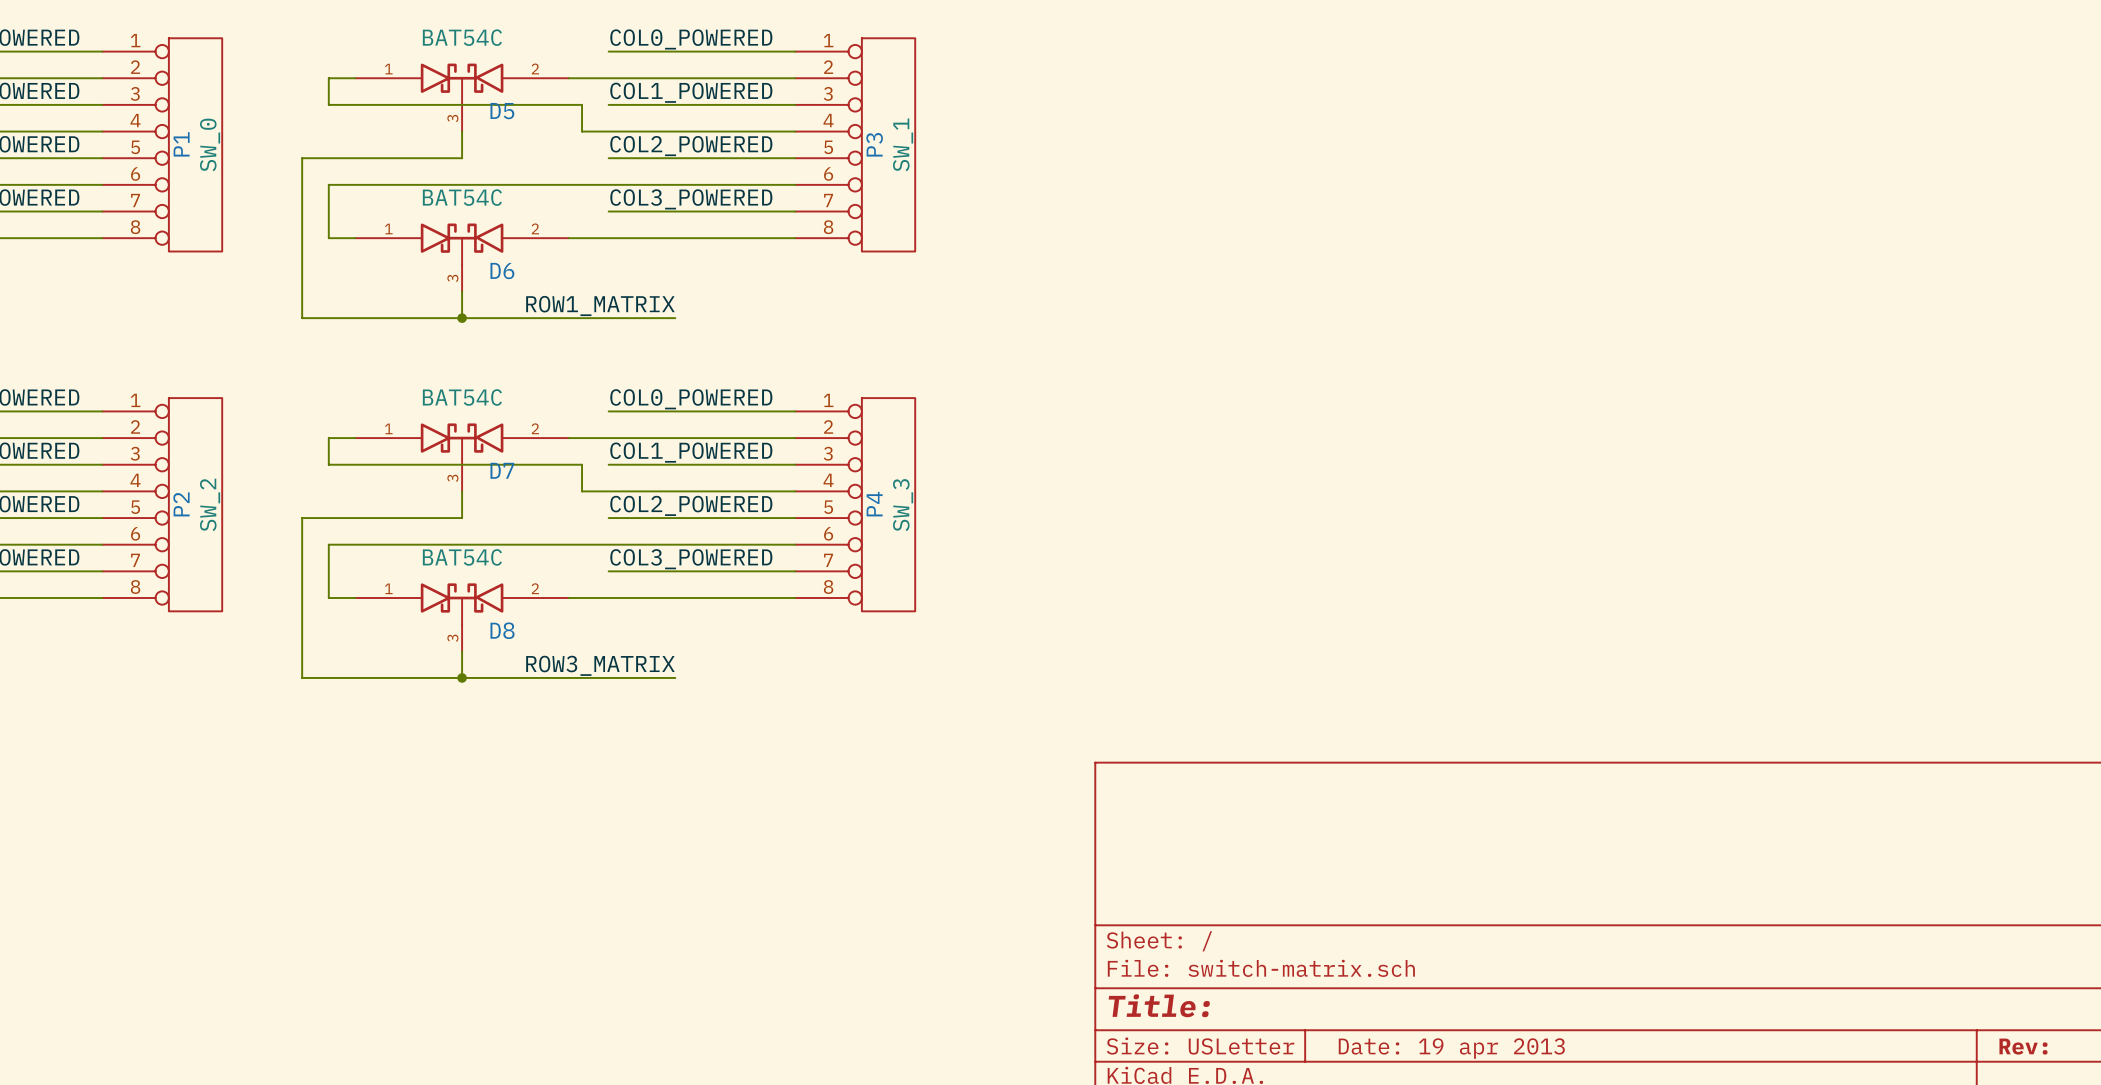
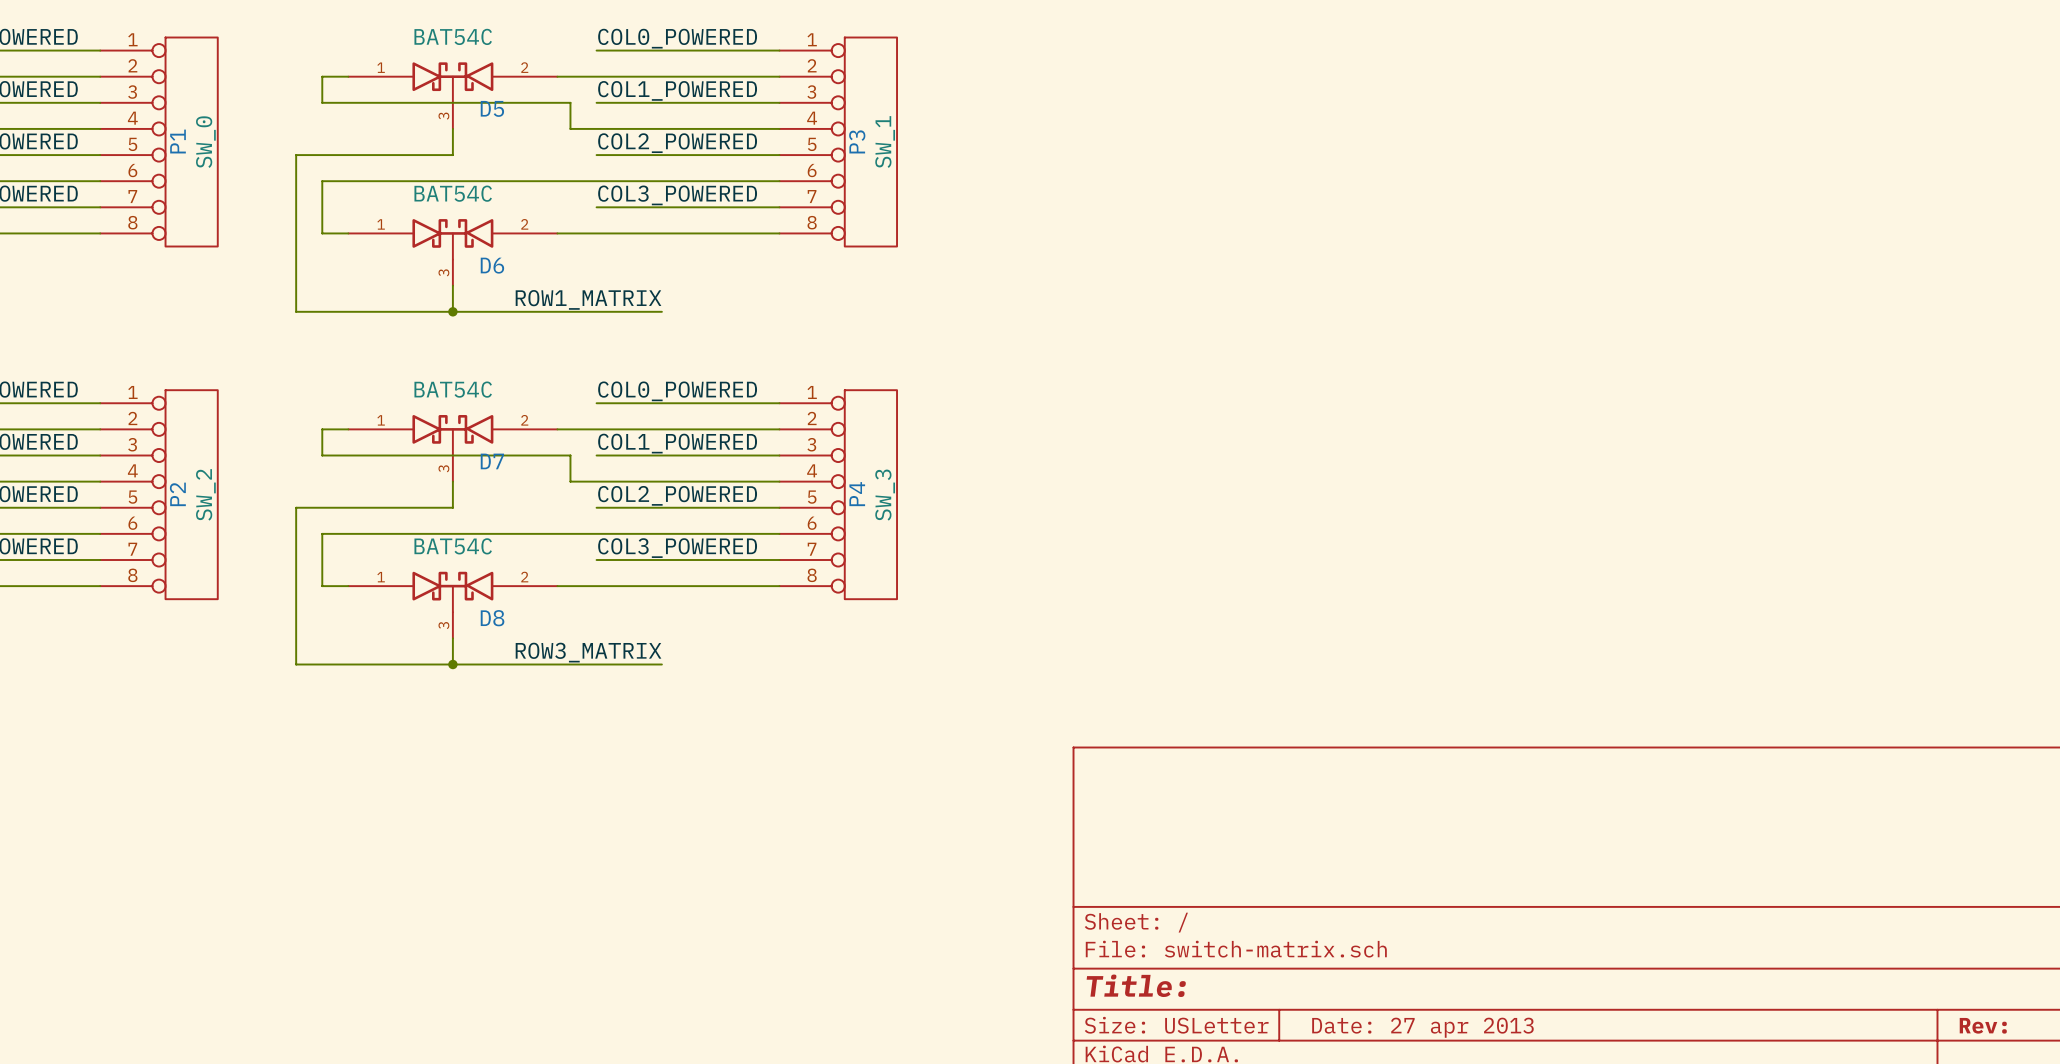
title block: Date: 19 apr 2013 (1451, 1048) -> Date: 27 apr 2013 (1422, 1027)

